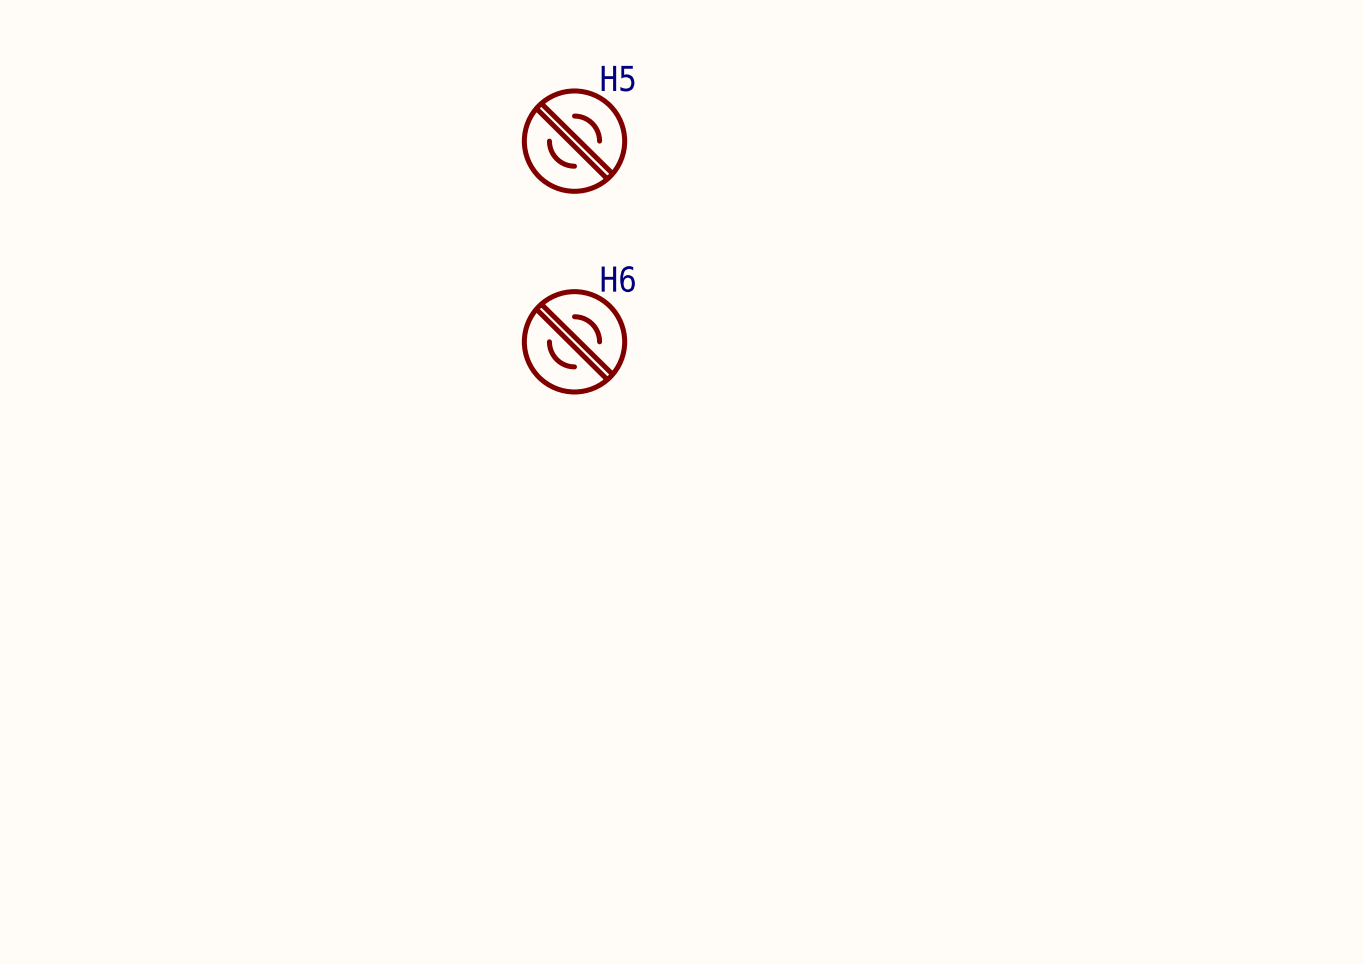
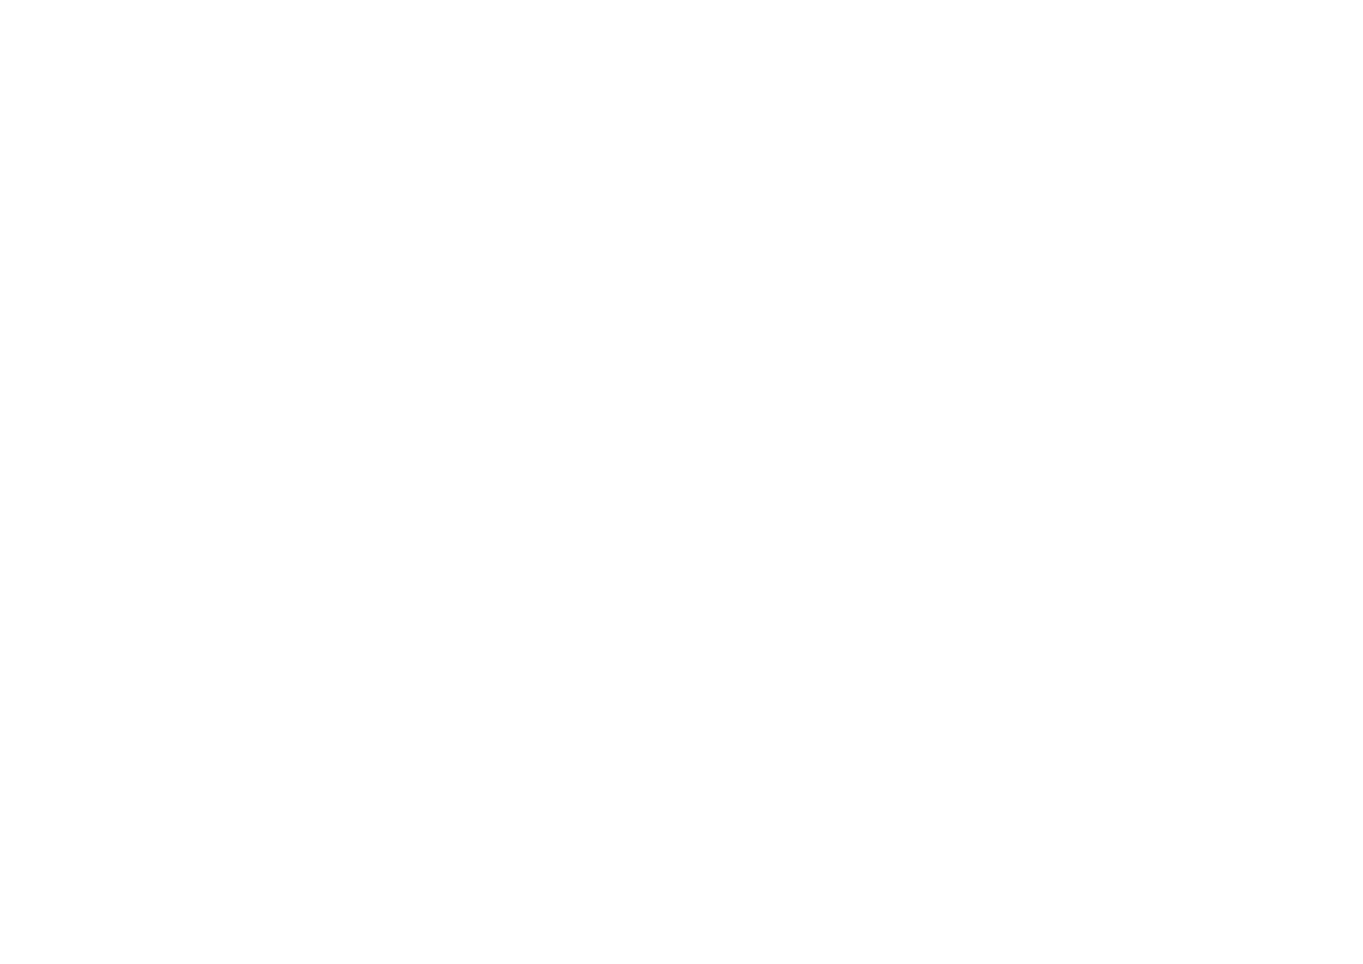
H5: (574, 141) -> none
H6: (574, 341) -> none

